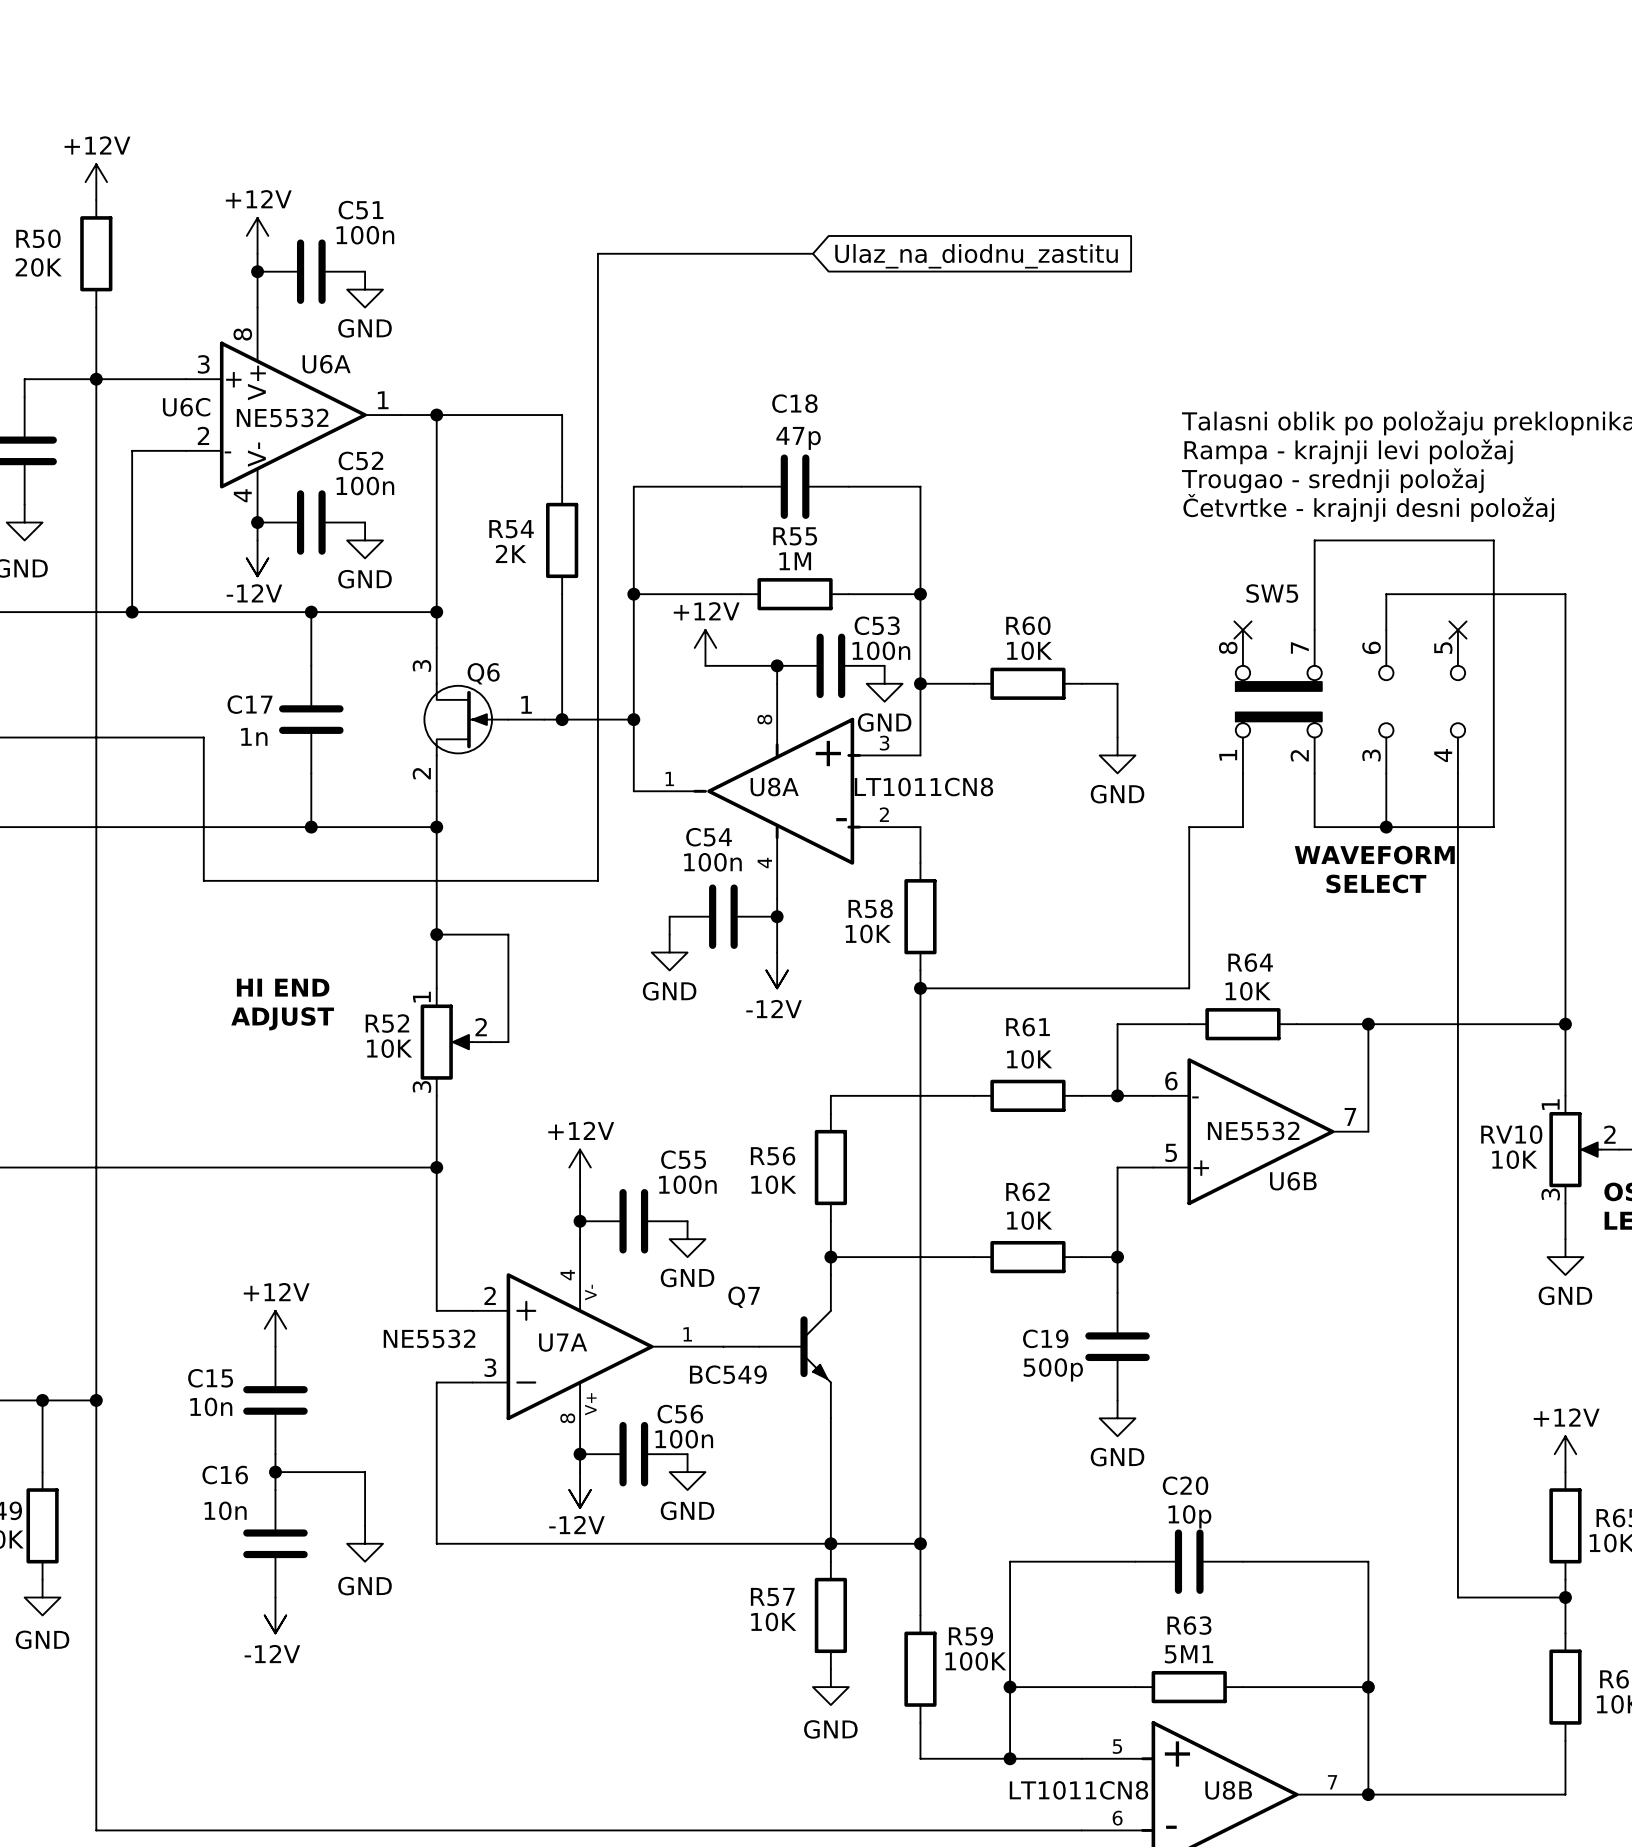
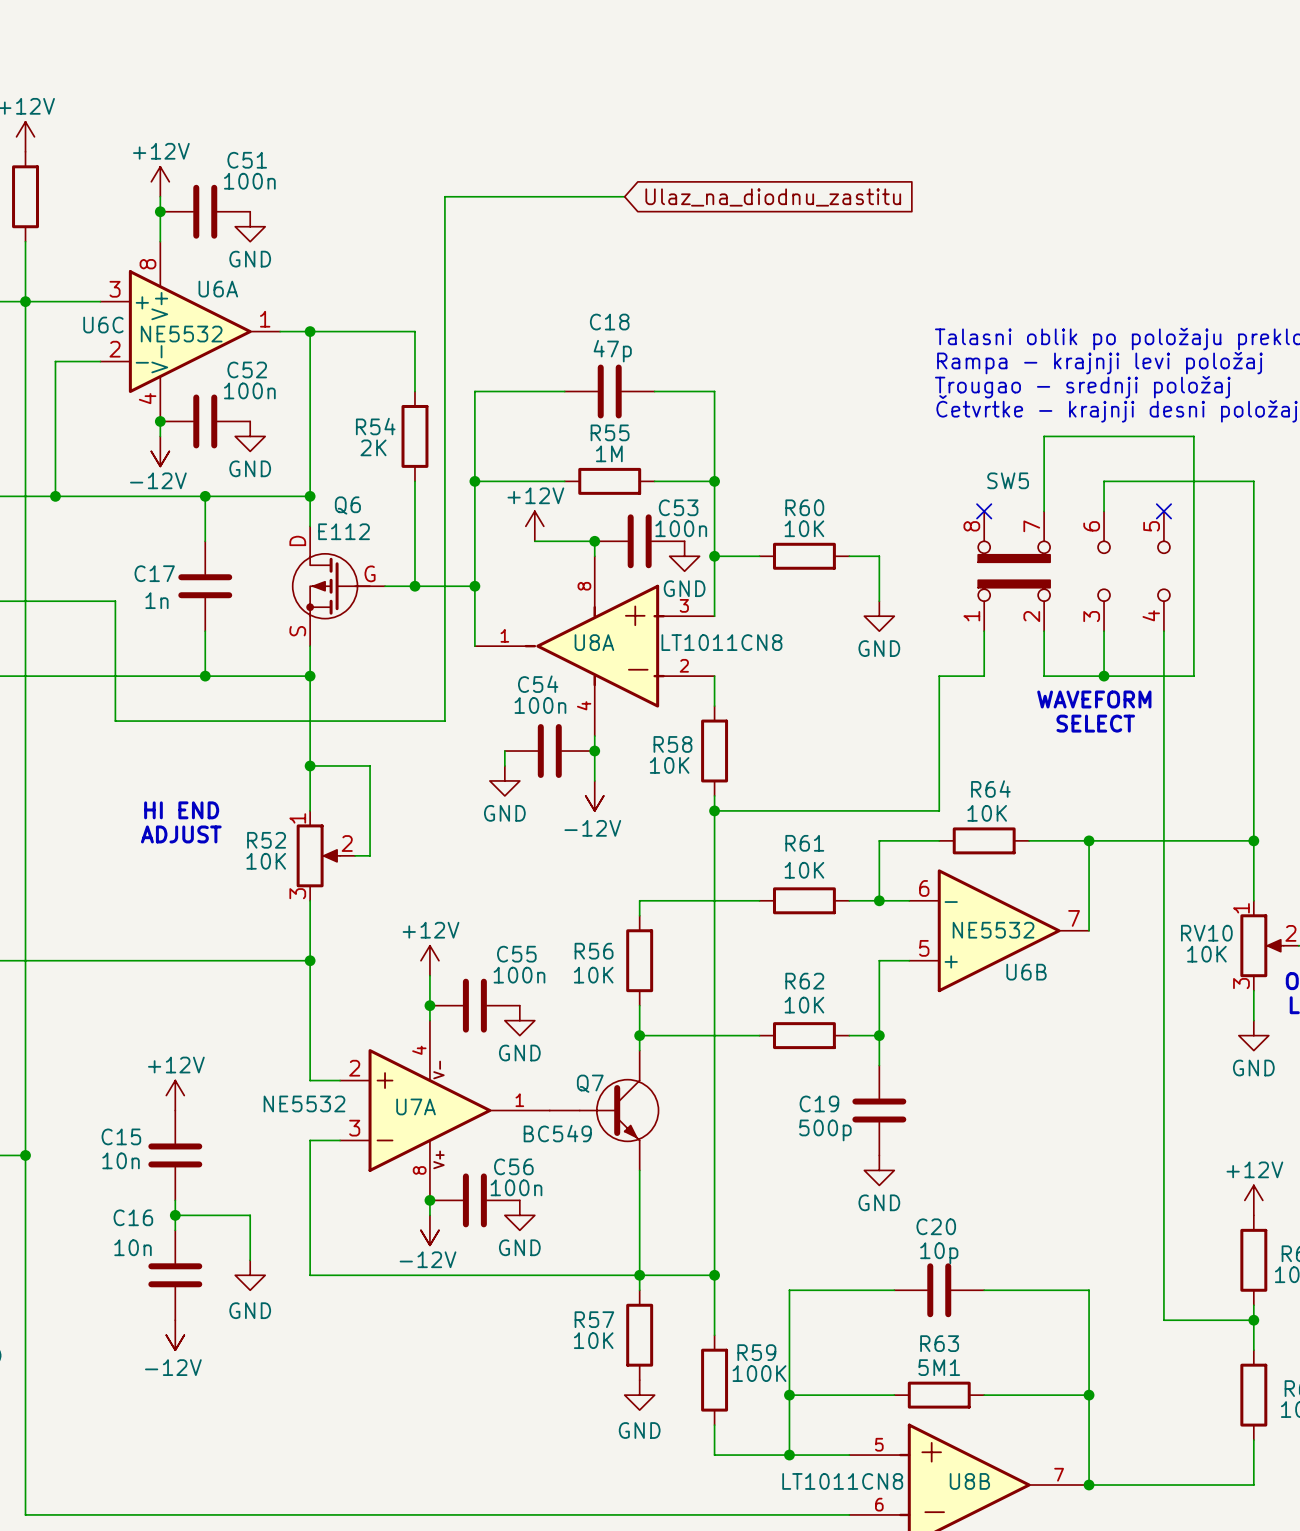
Q6 symbol: [424, 647, 545, 792] -> [292, 526, 386, 647]
Q6 value: none -> E112 (344, 531)
Q6 name position: Q6 (483, 673) -> Q6 (347, 505)
Q7 symbol: [723, 1275, 831, 1419] -> [549, 1050, 659, 1171]

